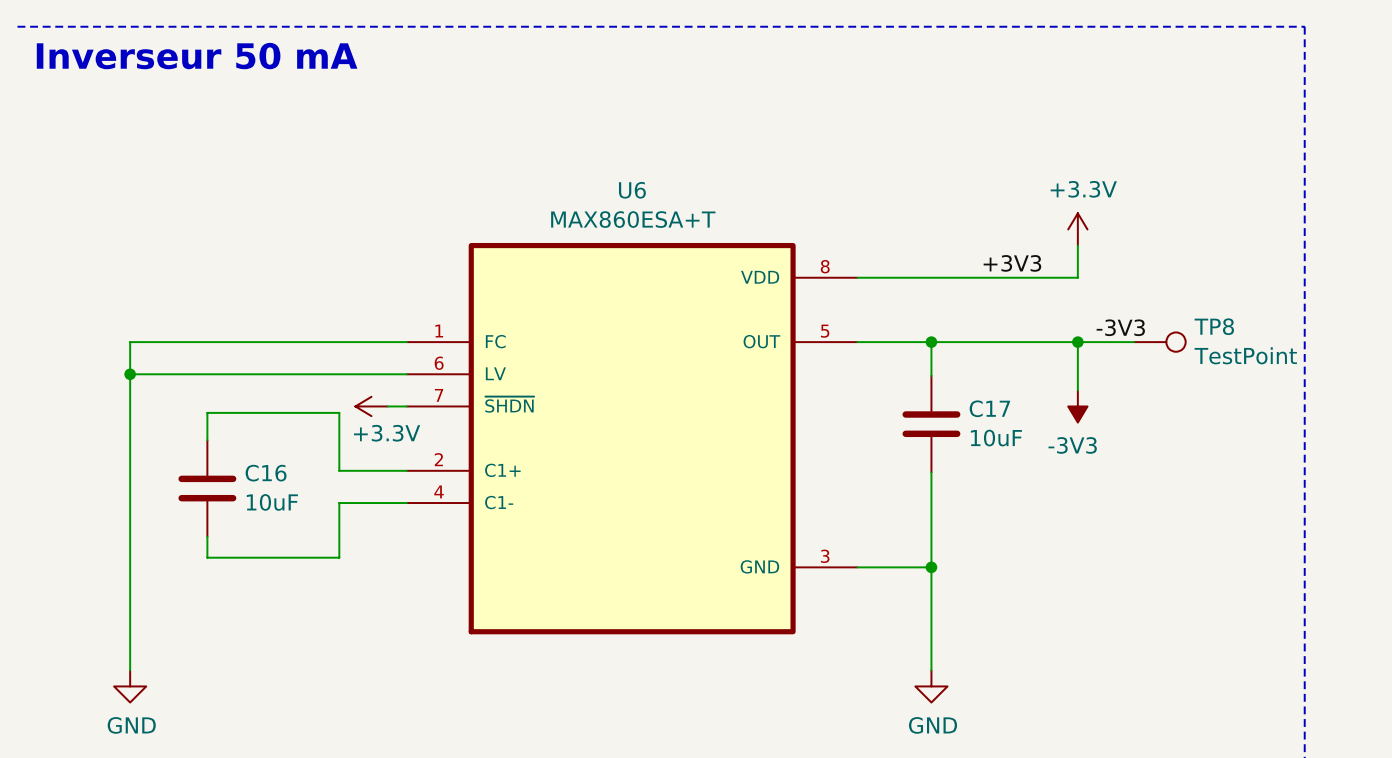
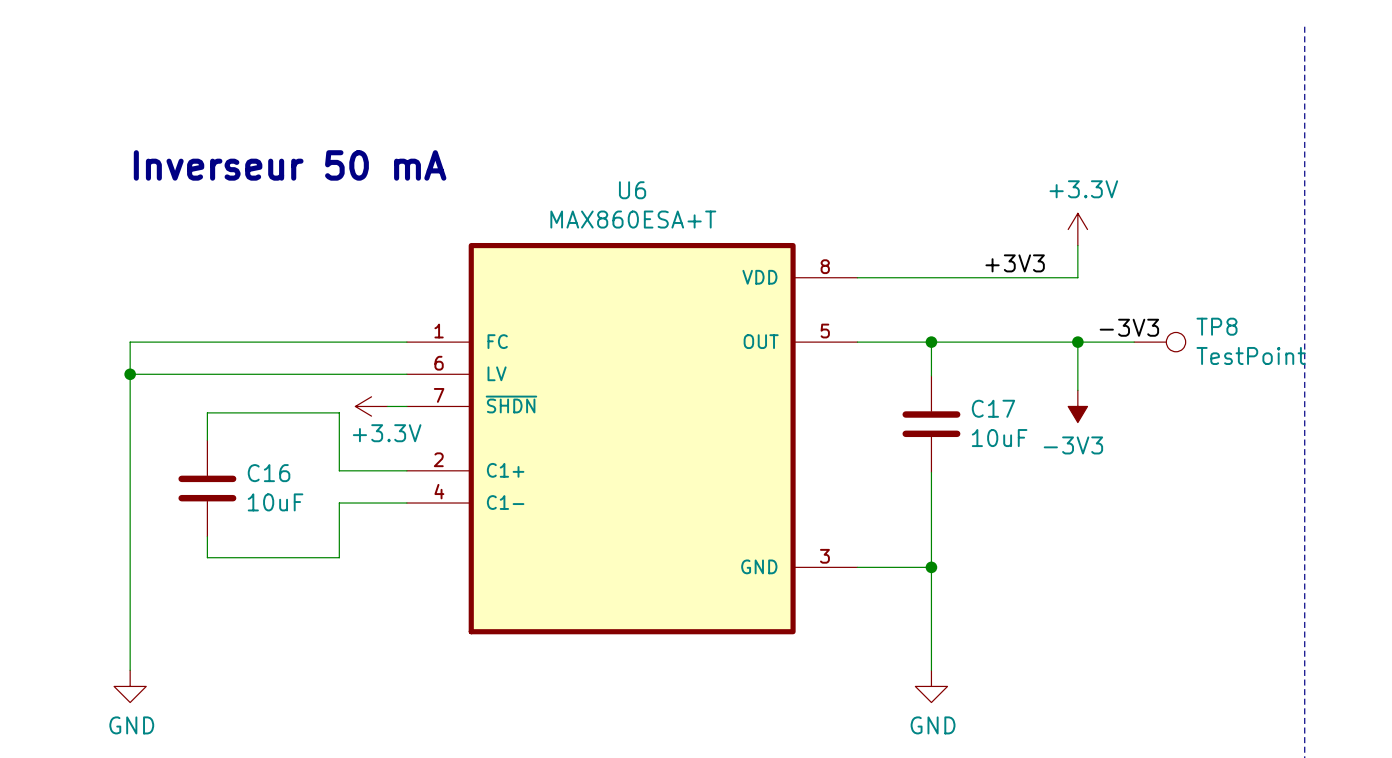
line: (17, 26) (1304, 26) -> none
text position: Inverseur 50 mA (197, 56) -> Inverseur 50 mA (290, 165)

